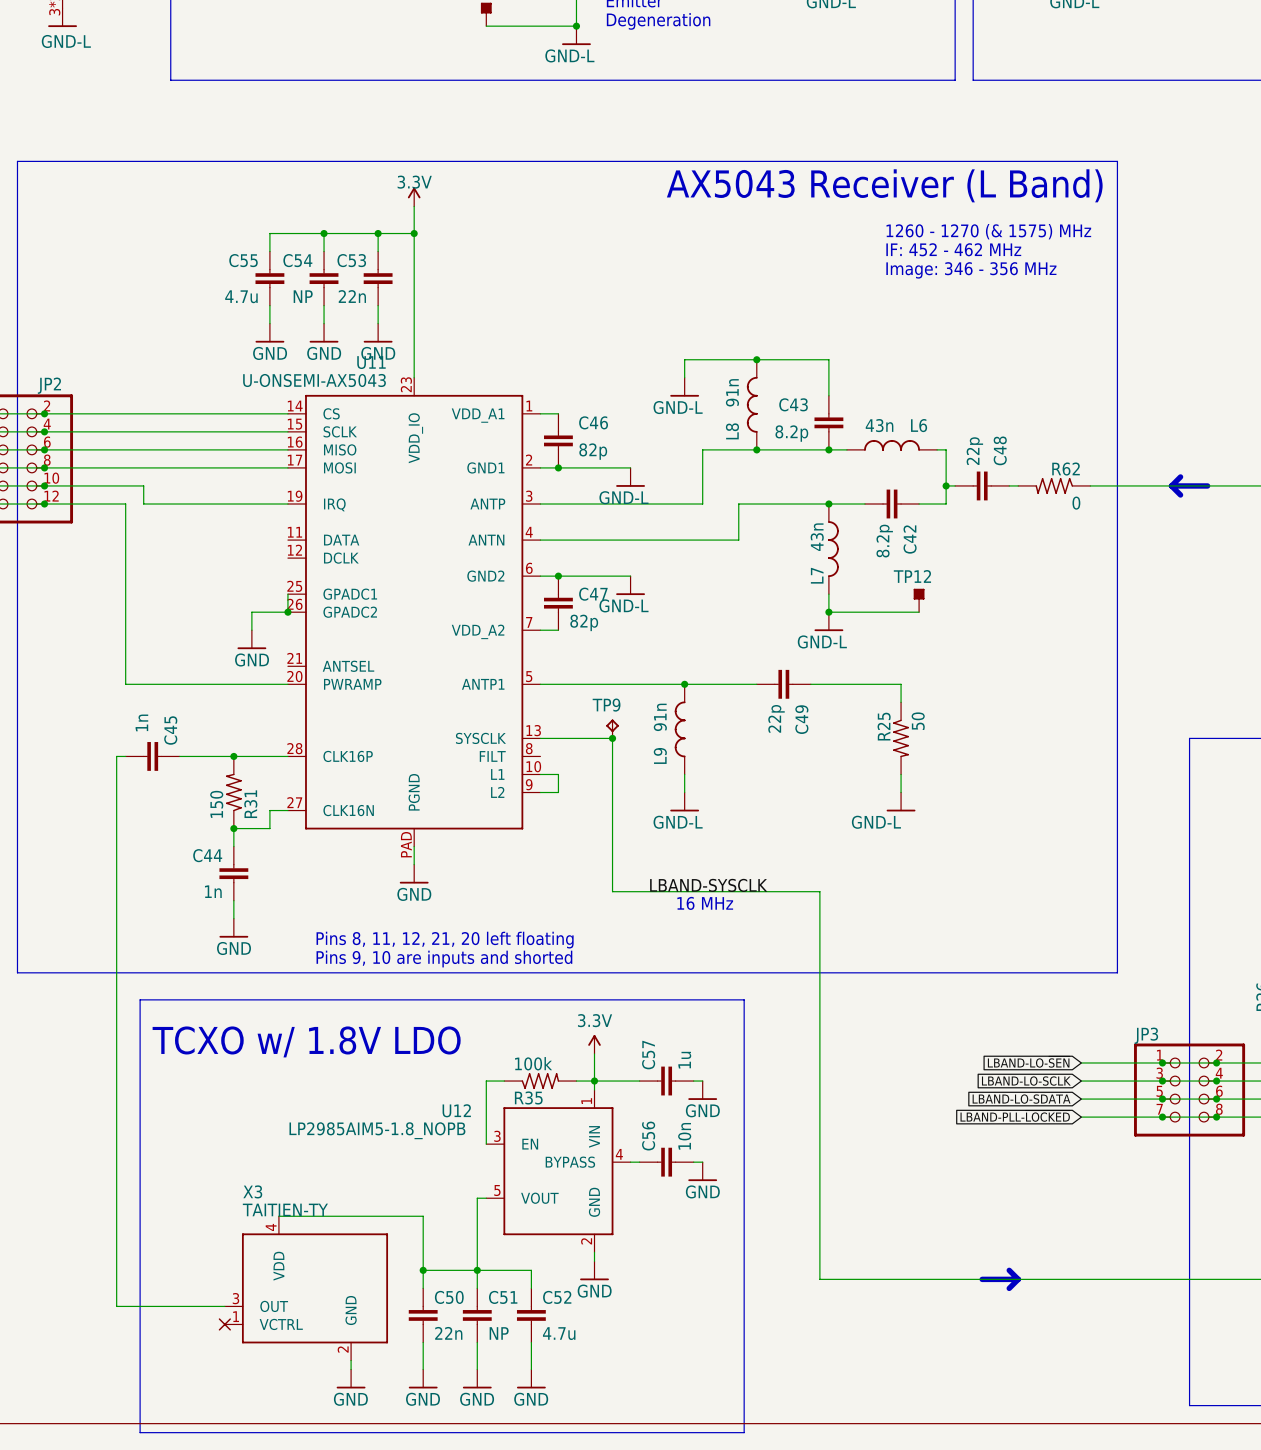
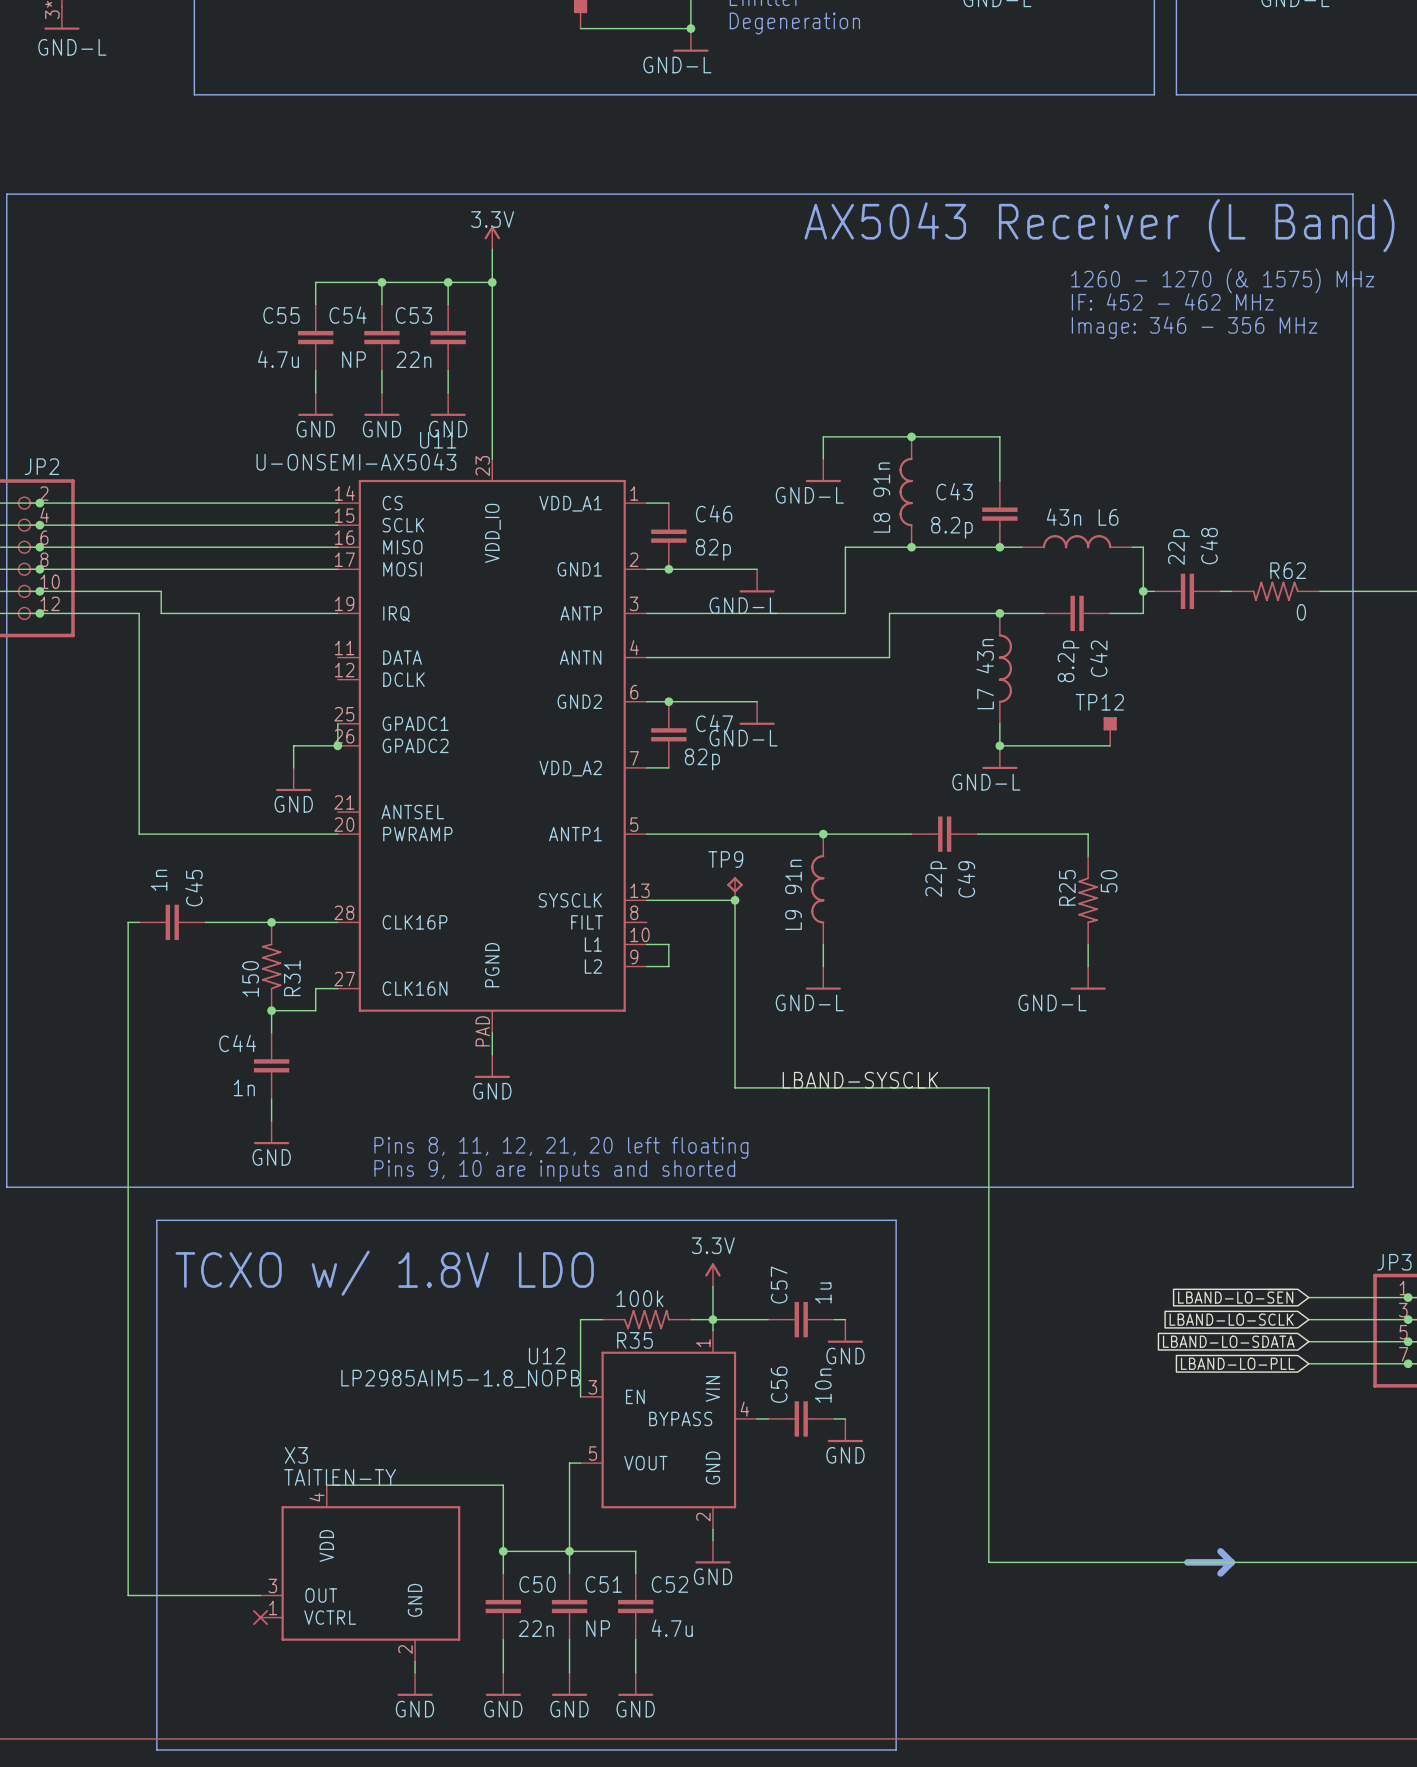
text: 16 MHz (705, 903) -> none
global label: LBAND-PLL-~{LOCKED} (1015, 1116) -> LBAND-LO-PLL (1237, 1363)

